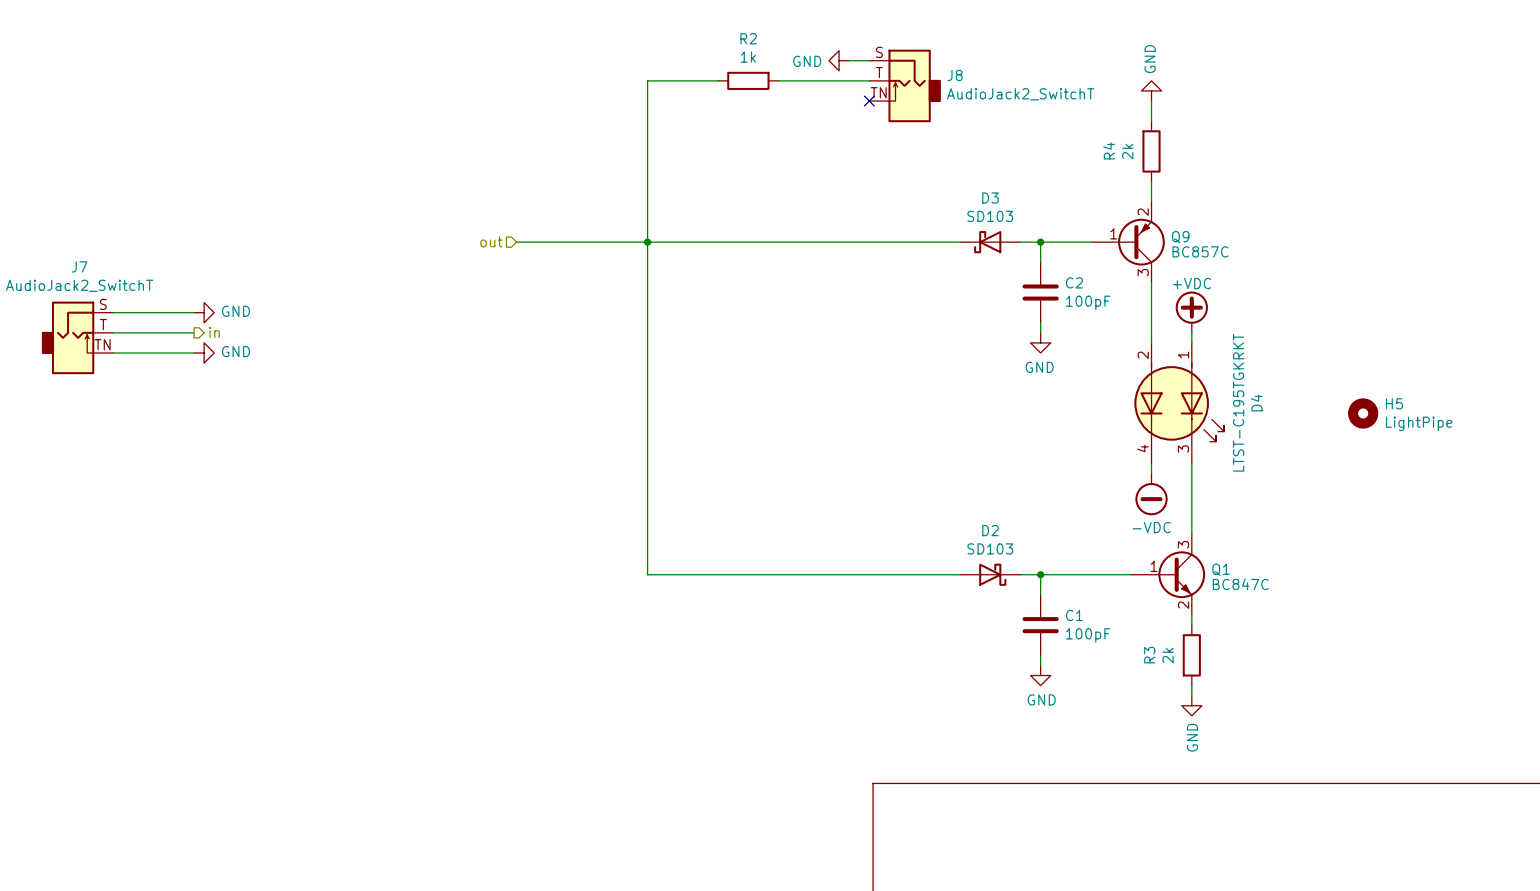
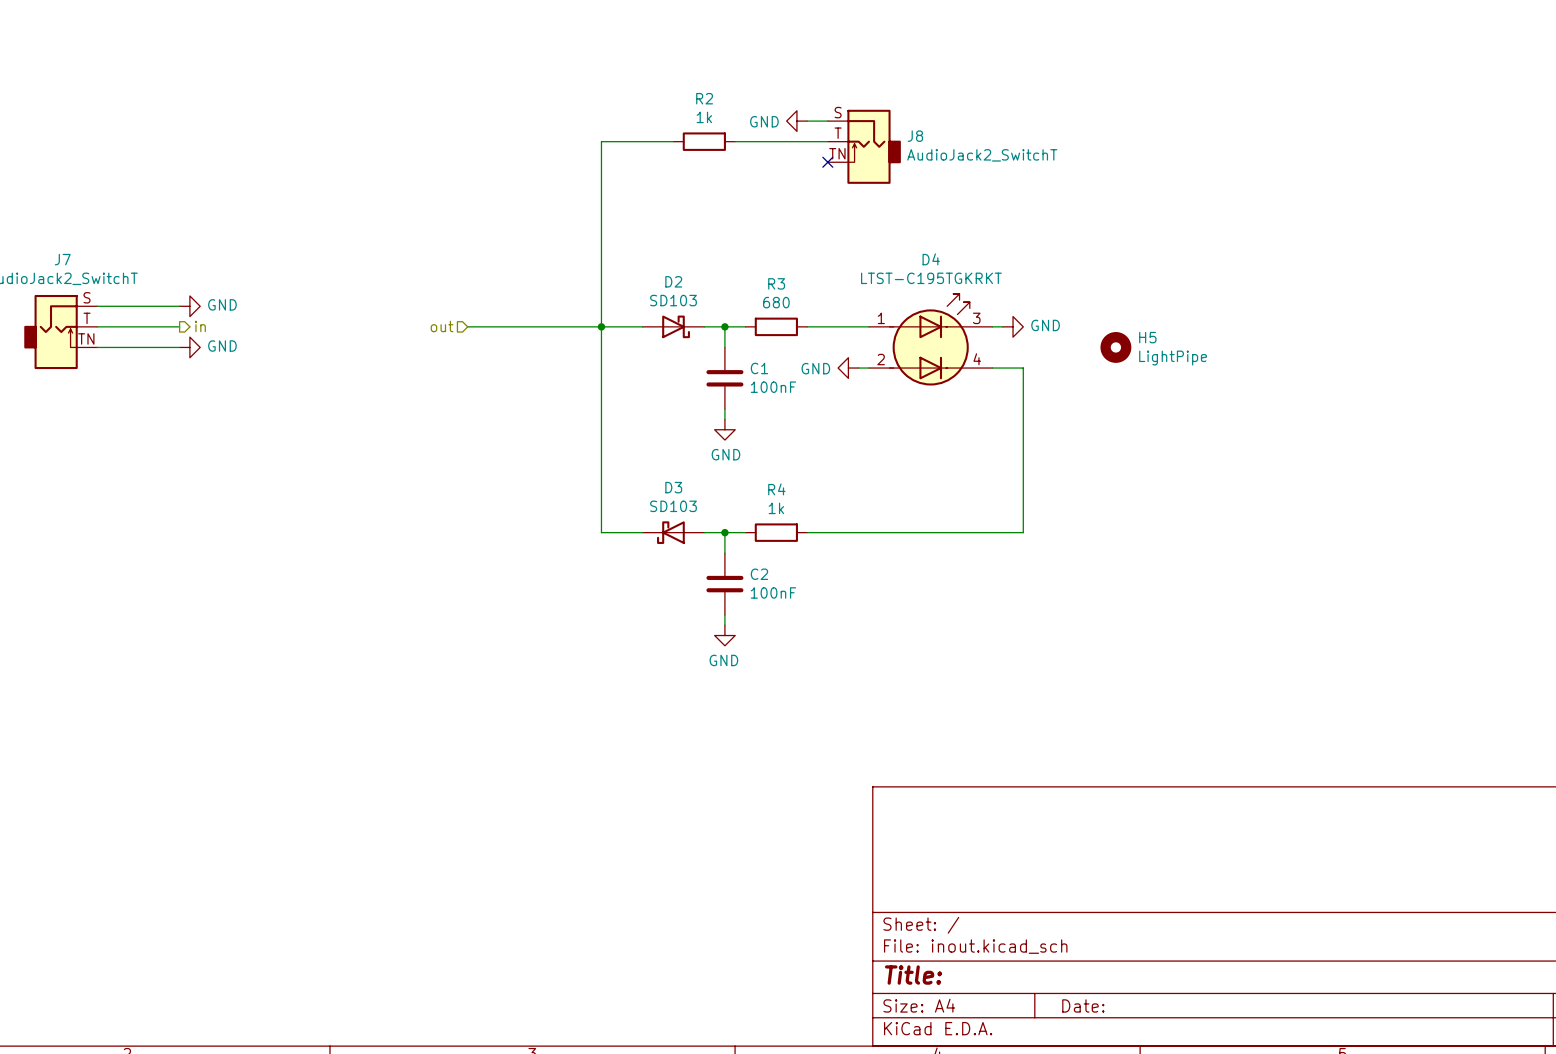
power symbol position: GND (839, 60) -> GND (796, 121)
wire: (849, 60) (869, 60) -> (807, 121) (827, 121)
wire: (718, 80) (647, 80) (647, 574) (960, 574) -> none
R2 position: (748, 80) -> (704, 141)
wire: (778, 80) (869, 80) -> (735, 141) (827, 141)
J8 position: (905, 85) -> (864, 146)
power symbol: GND (1151, 90) -> none
no-connect mark: (869, 101) -> none
wire: (1151, 101) (1151, 121) -> none
wire: none -> (673, 141) (601, 141) (601, 532) (642, 532)
R4 value: 2k (1127, 151) -> 1k (776, 508)
R4 rotation: 0° (1151, 151) -> 90° clockwise (776, 532)
R4 position: (1151, 151) -> (776, 532)
no-connect mark: none -> (827, 162)
wire: (1151, 181) (1151, 201) -> none
hierarchical label position: out (491, 241) -> out (442, 326)
wire: (516, 242) (960, 242) -> none
junction: (647, 242) -> none
D3 position: (990, 242) -> (673, 532)
wire: (1020, 242) (1091, 242) -> none
wire: (1040, 242) (1040, 262) -> none
junction: (1040, 242) -> none
Q9: BC857C (1127, 242) -> none
wire: (1151, 282) (1151, 342) -> none
C2 position: (1040, 292) -> (724, 584)
C2 value: 100pF (1088, 302) -> 100nF (773, 592)
power symbol: +VDC (1191, 312) -> none
wire: (1040, 322) (1040, 332) -> none
wire: none -> (467, 326) (642, 326)
junction: none -> (601, 326)
wire: none -> (704, 326) (745, 326)
wire: none -> (724, 326) (724, 347)
junction: none -> (724, 326)
wire: none -> (807, 326) (868, 326)
wire: none -> (992, 326) (1002, 326)
wire: (1191, 332) (1191, 342) -> none
power symbol rotation: 0° (1040, 342) -> 90° counterclockwise (1013, 326)
power symbol position: GND (1040, 342) -> GND (1013, 326)
power symbol: none -> GND (848, 368)
wire: none -> (858, 368) (868, 368)
wire: none -> (992, 368) (1023, 368) (1023, 532) (807, 532)
D4 rotation: 0° (1179, 402) -> 90° counterclockwise (929, 339)
D4 position: (1179, 403) -> (930, 339)
wire: none -> (724, 409) (724, 419)
H5 position: (1363, 413) -> (1115, 347)
power symbol: none -> GND (724, 429)
wire: (1151, 463) (1151, 473) -> none
wire: (1191, 463) (1191, 534) -> none
power symbol: -VDC (1151, 494) -> none
wire: none -> (704, 532) (745, 532)
wire: none -> (724, 532) (724, 553)
junction: none -> (724, 532)
D2 position: (990, 574) -> (673, 326)
wire: (1020, 574) (1131, 574) -> none
wire: (1040, 574) (1040, 594) -> none
junction: (1040, 574) -> none
Q1: BC847C (1168, 574) -> none
wire: none -> (724, 614) (724, 625)
wire: (1191, 615) (1191, 625) -> none
C1 position: (1040, 625) -> (724, 378)
power symbol: none -> GND (724, 635)
C1 value: 100pF (1088, 635) -> 100nF (773, 387)
wire: (1040, 655) (1040, 665) -> none
R3 value: 2k (1168, 655) -> 680 (776, 302)
R3 rotation: 0° (1191, 655) -> 90° clockwise (776, 326)
R3 position: (1191, 655) -> (776, 326)
power symbol: GND (1040, 675) -> none
wire: (1191, 685) (1191, 695) -> none
power symbol: GND (1191, 705) -> none

